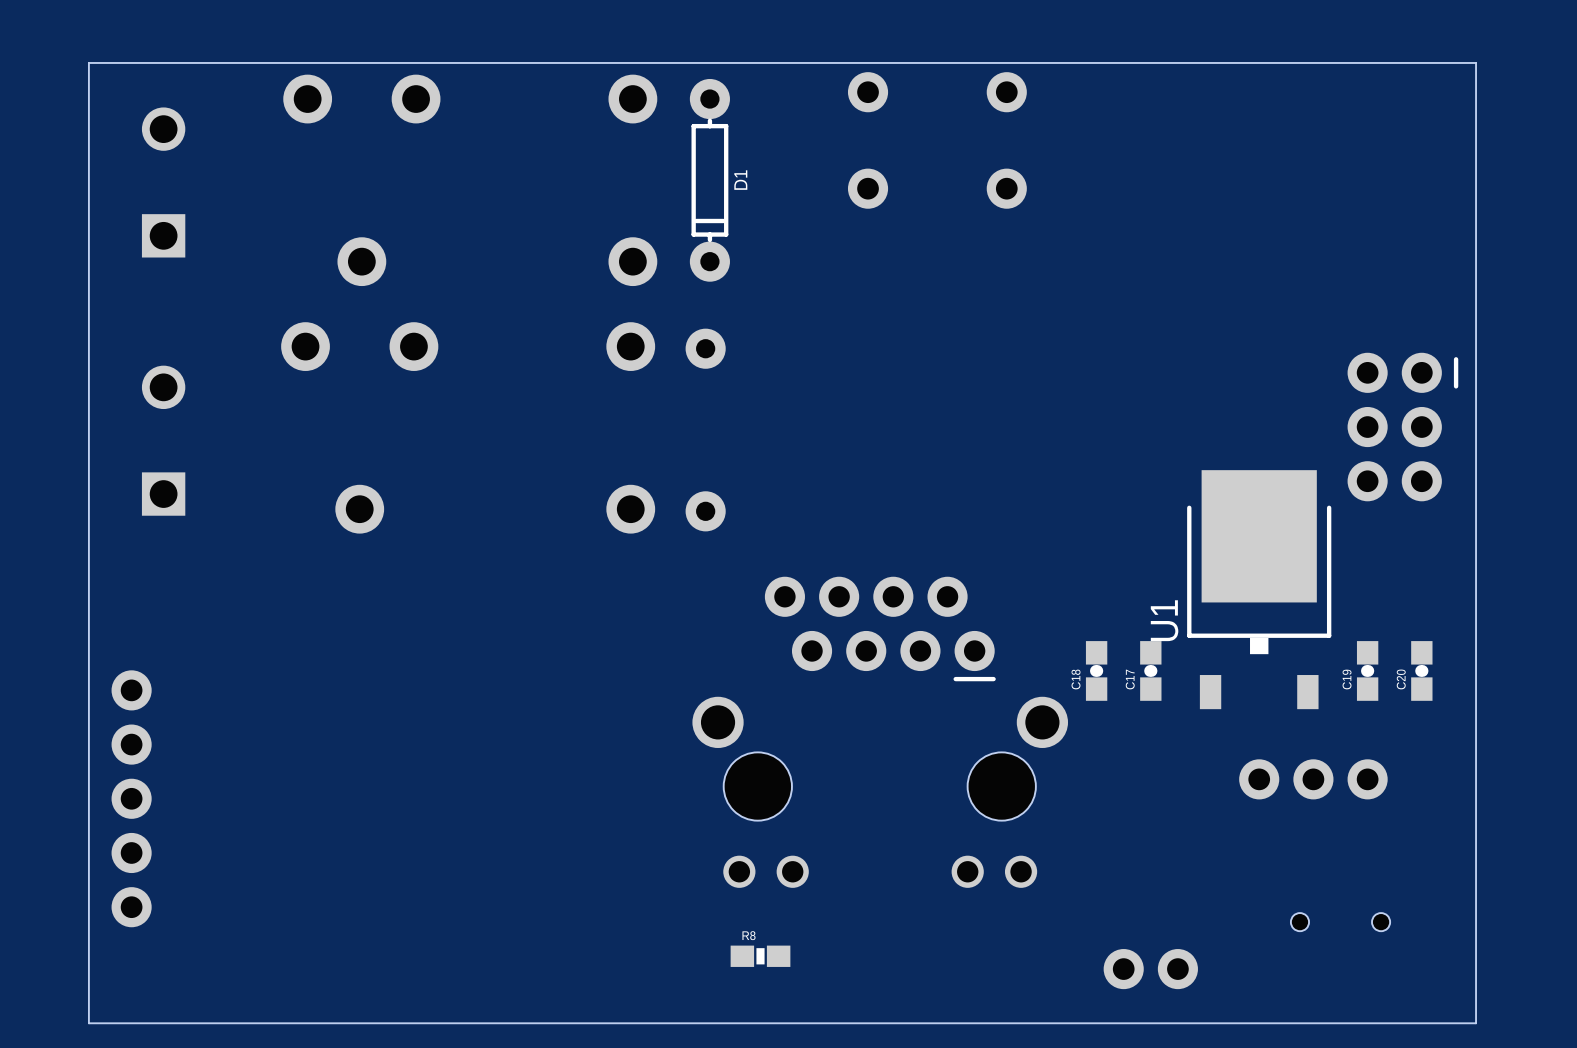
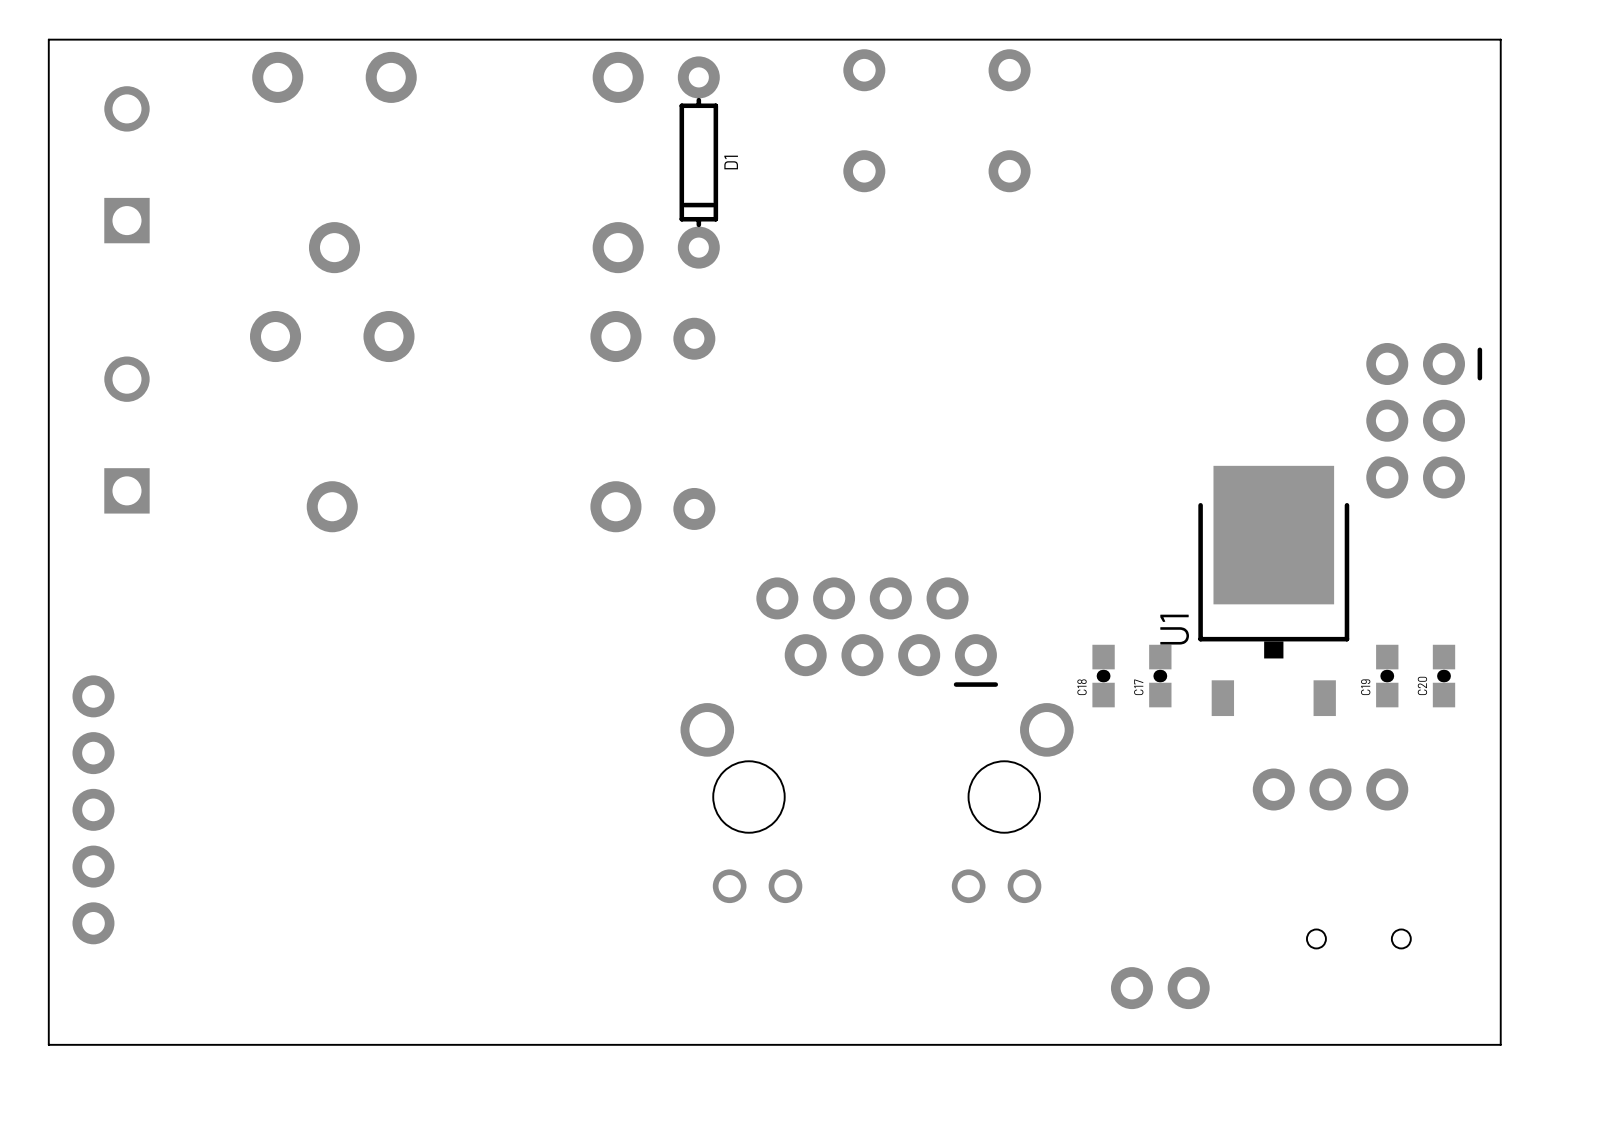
R8: (760, 956) -> none

